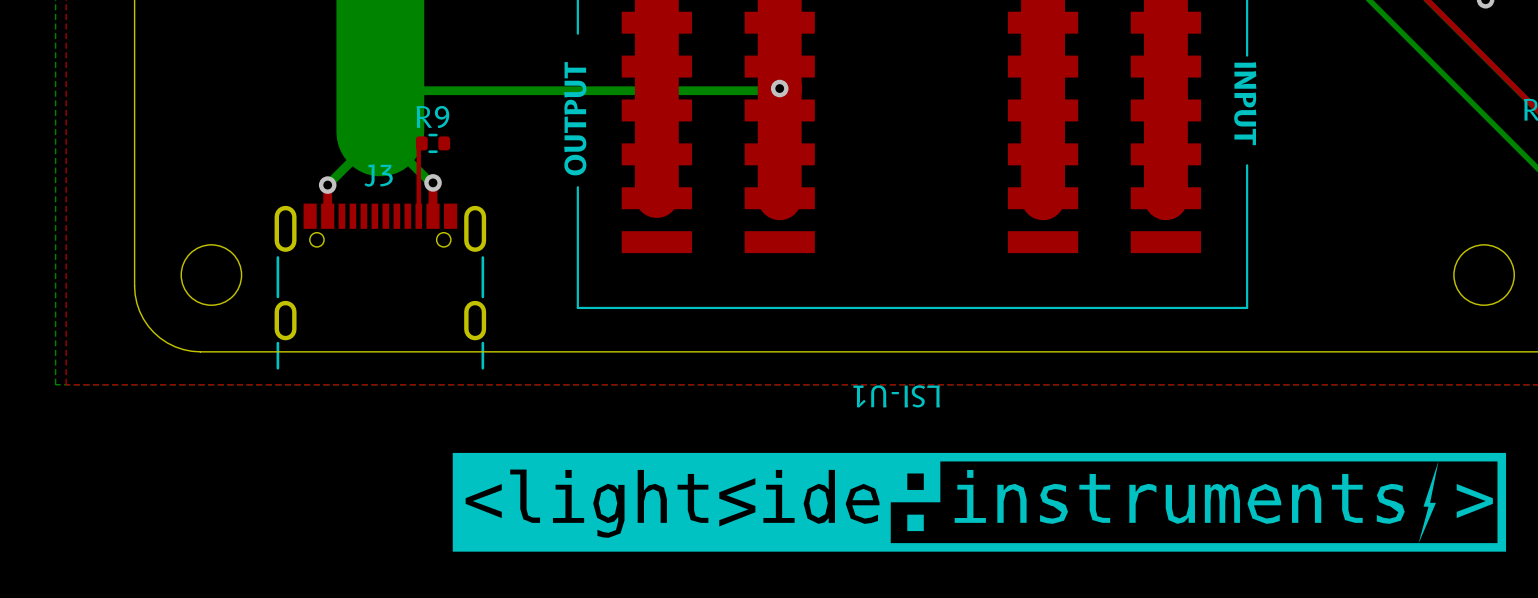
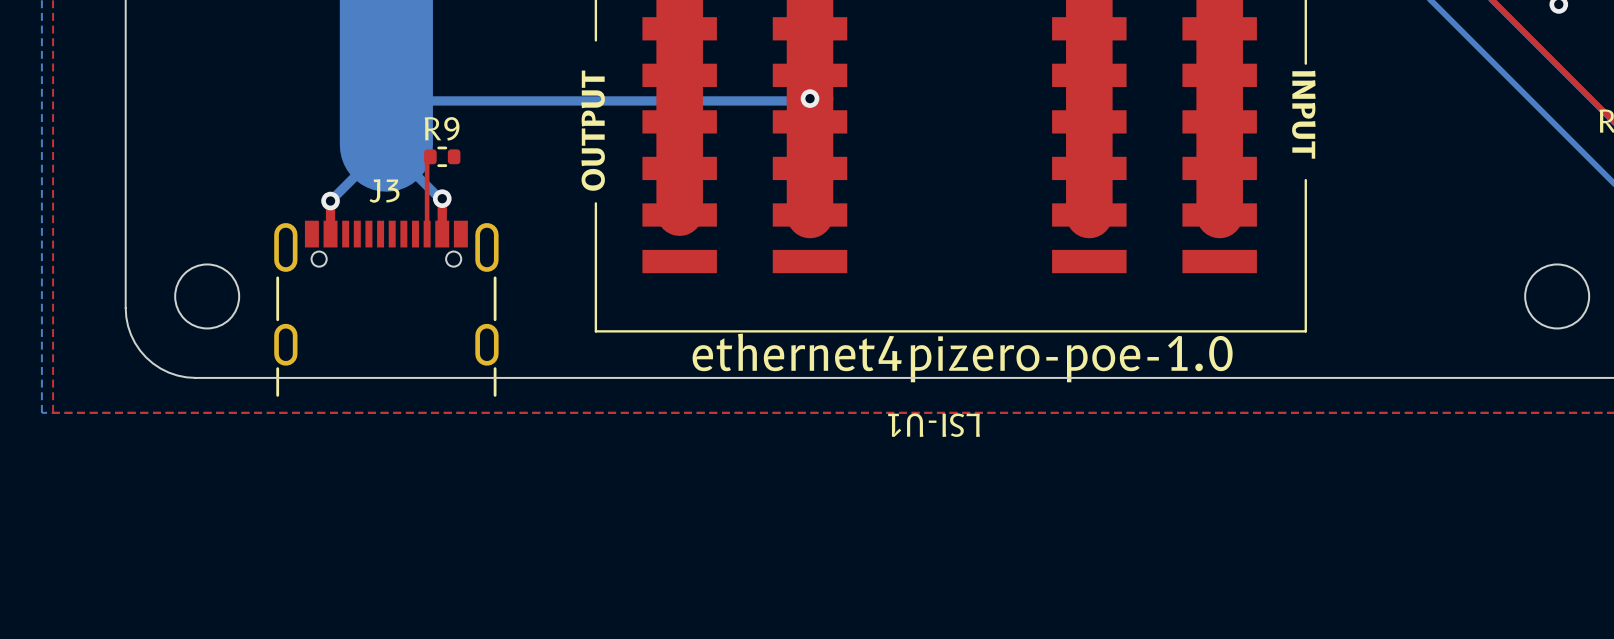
text: none -> ethernet4pizero-poe-1.0 (962, 357)
drawing: [452, 452, 1507, 552] -> none

